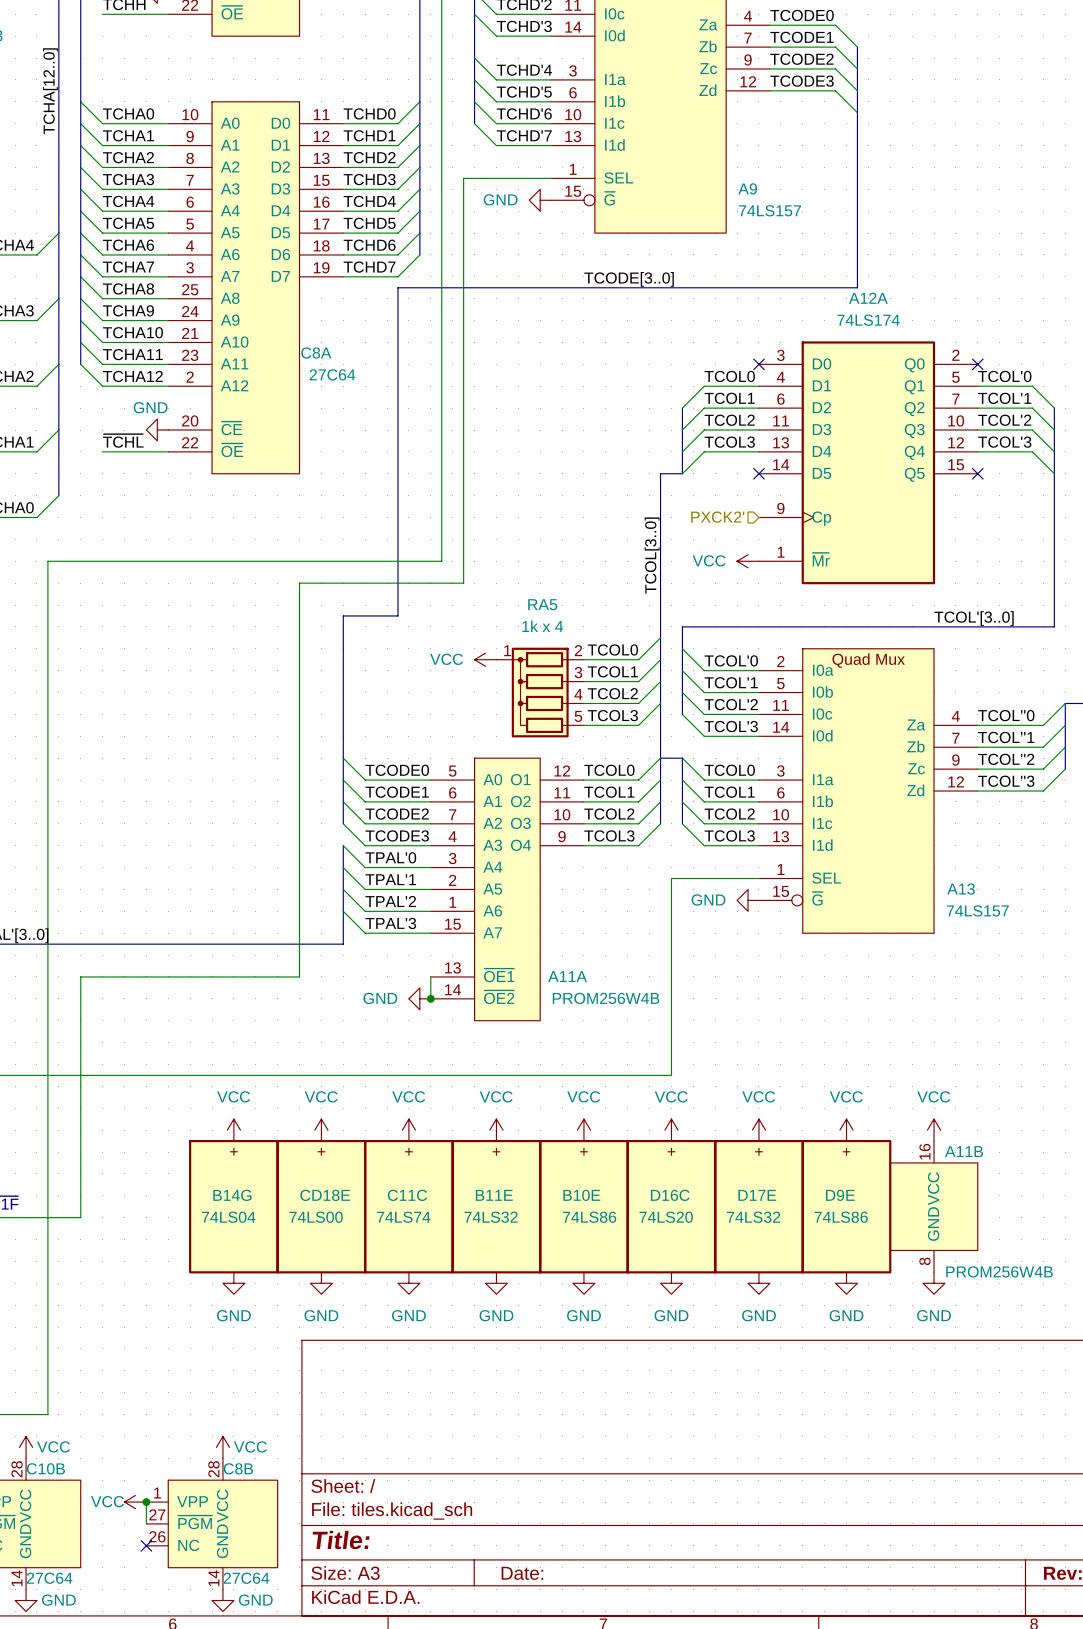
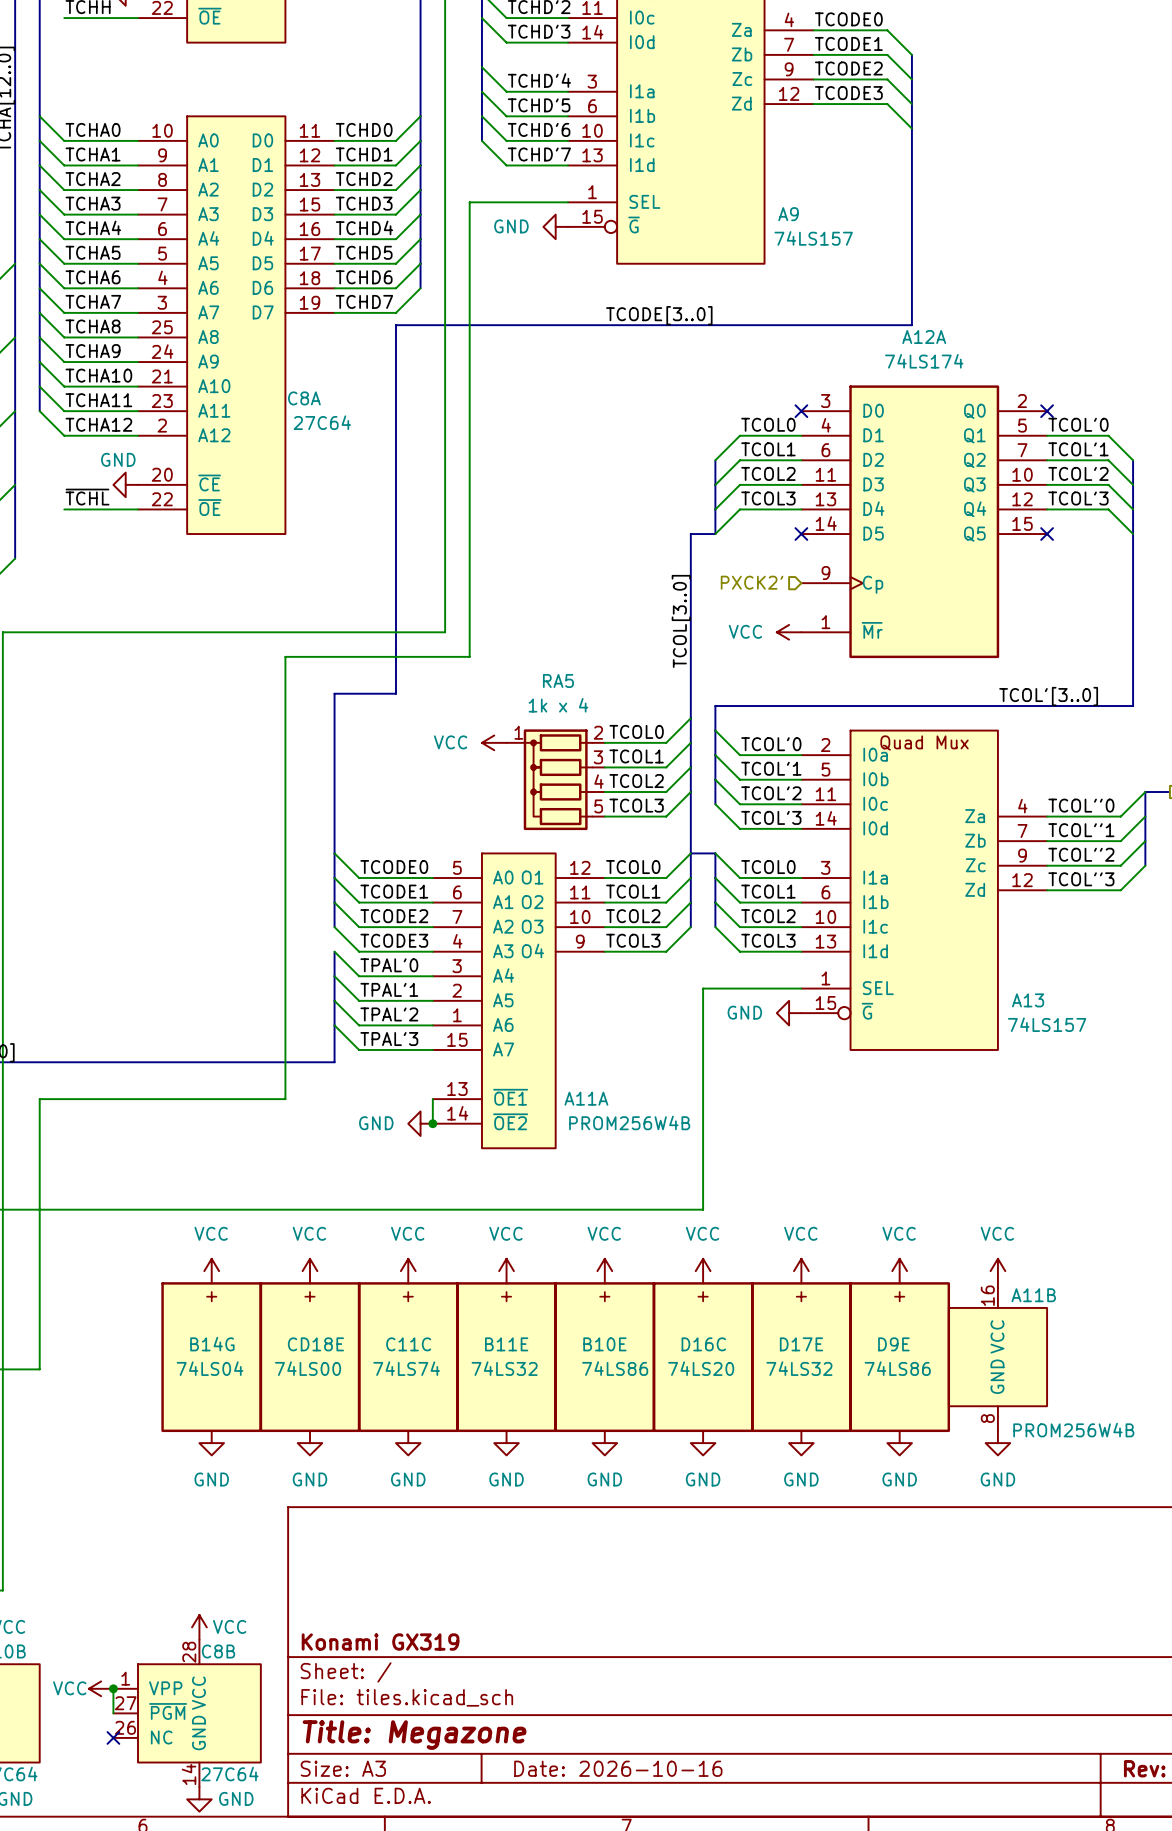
title block: none -> Konami GX319 (380, 1642)
title block: Title: (341, 1540) -> Title: Megazone (414, 1735)
title block: Date: (522, 1573) -> Date: 2026-10-16 (618, 1768)

